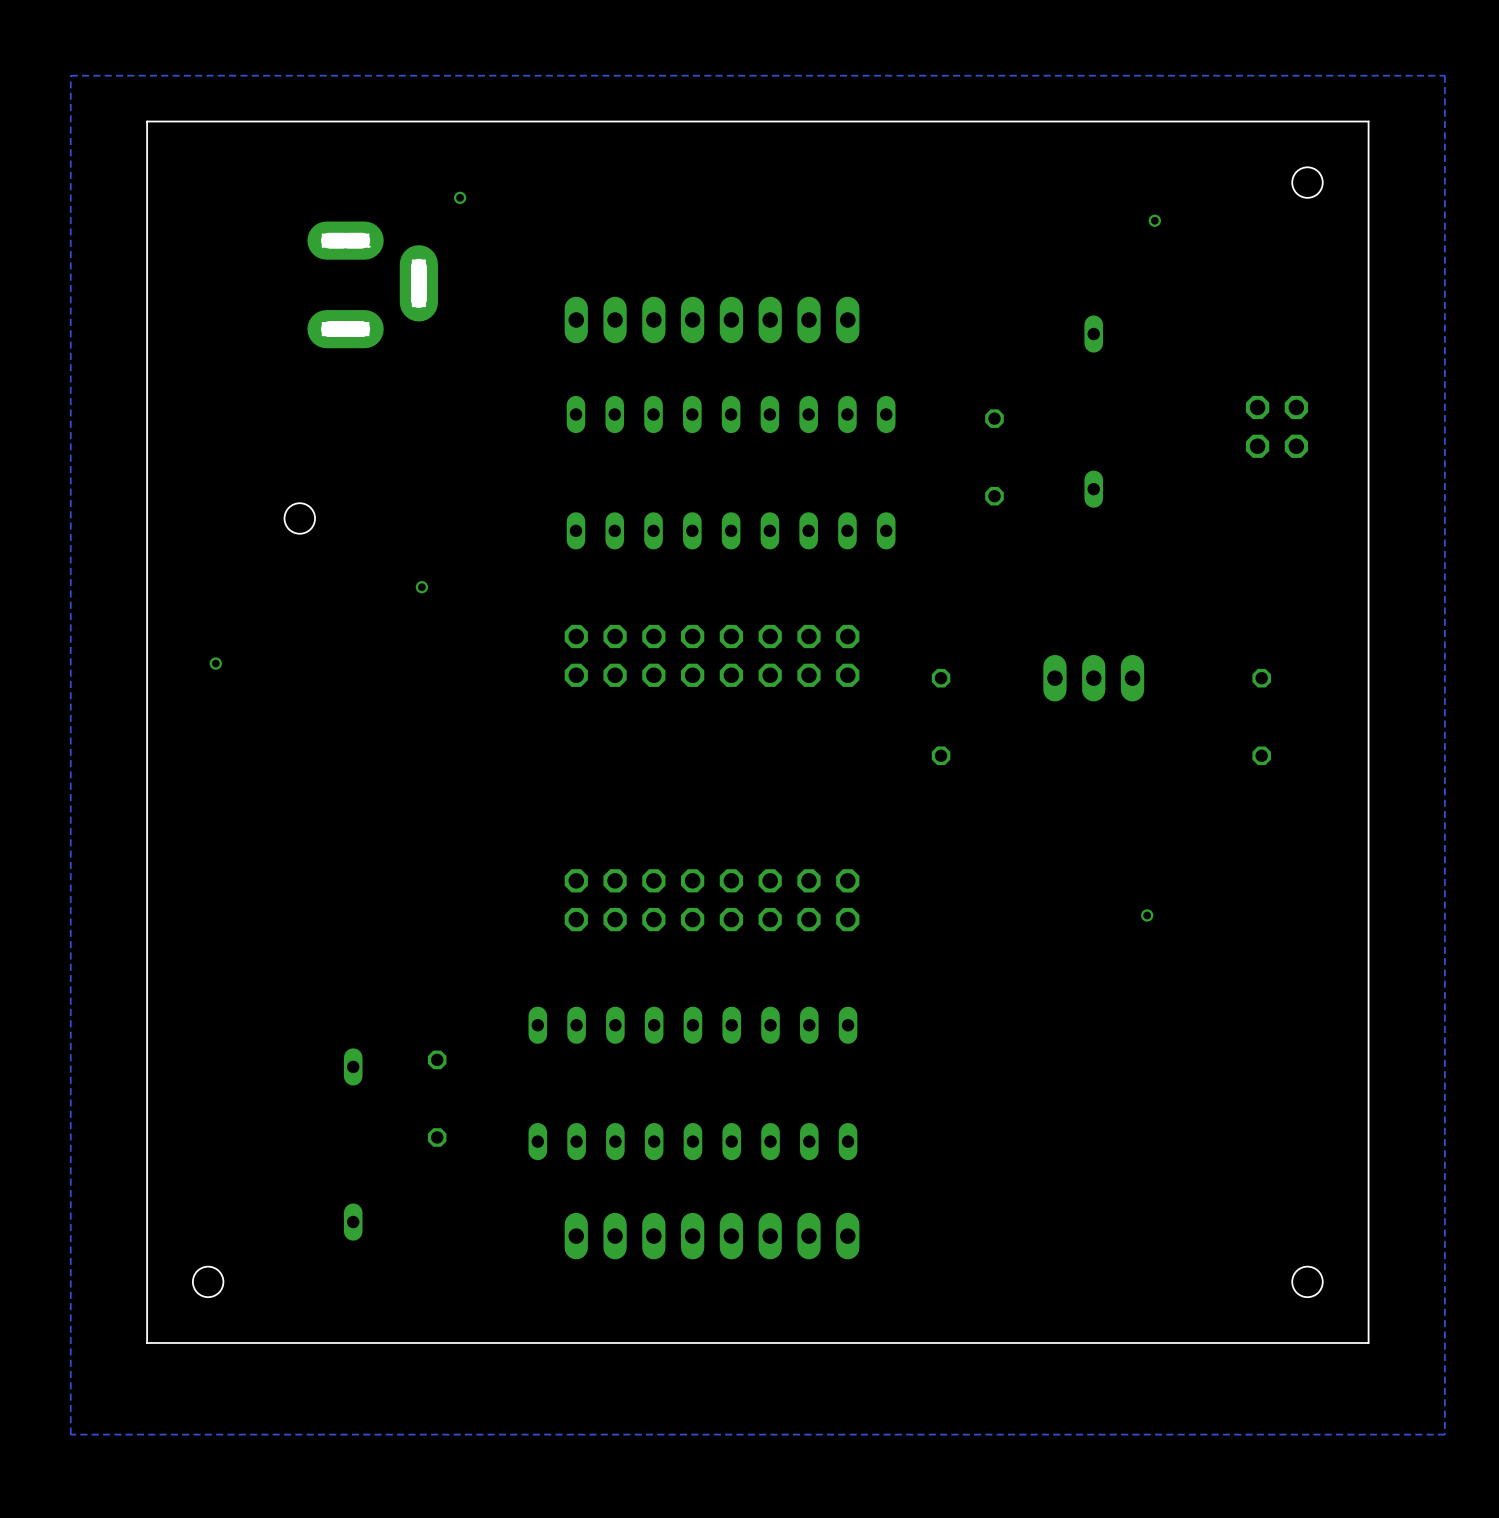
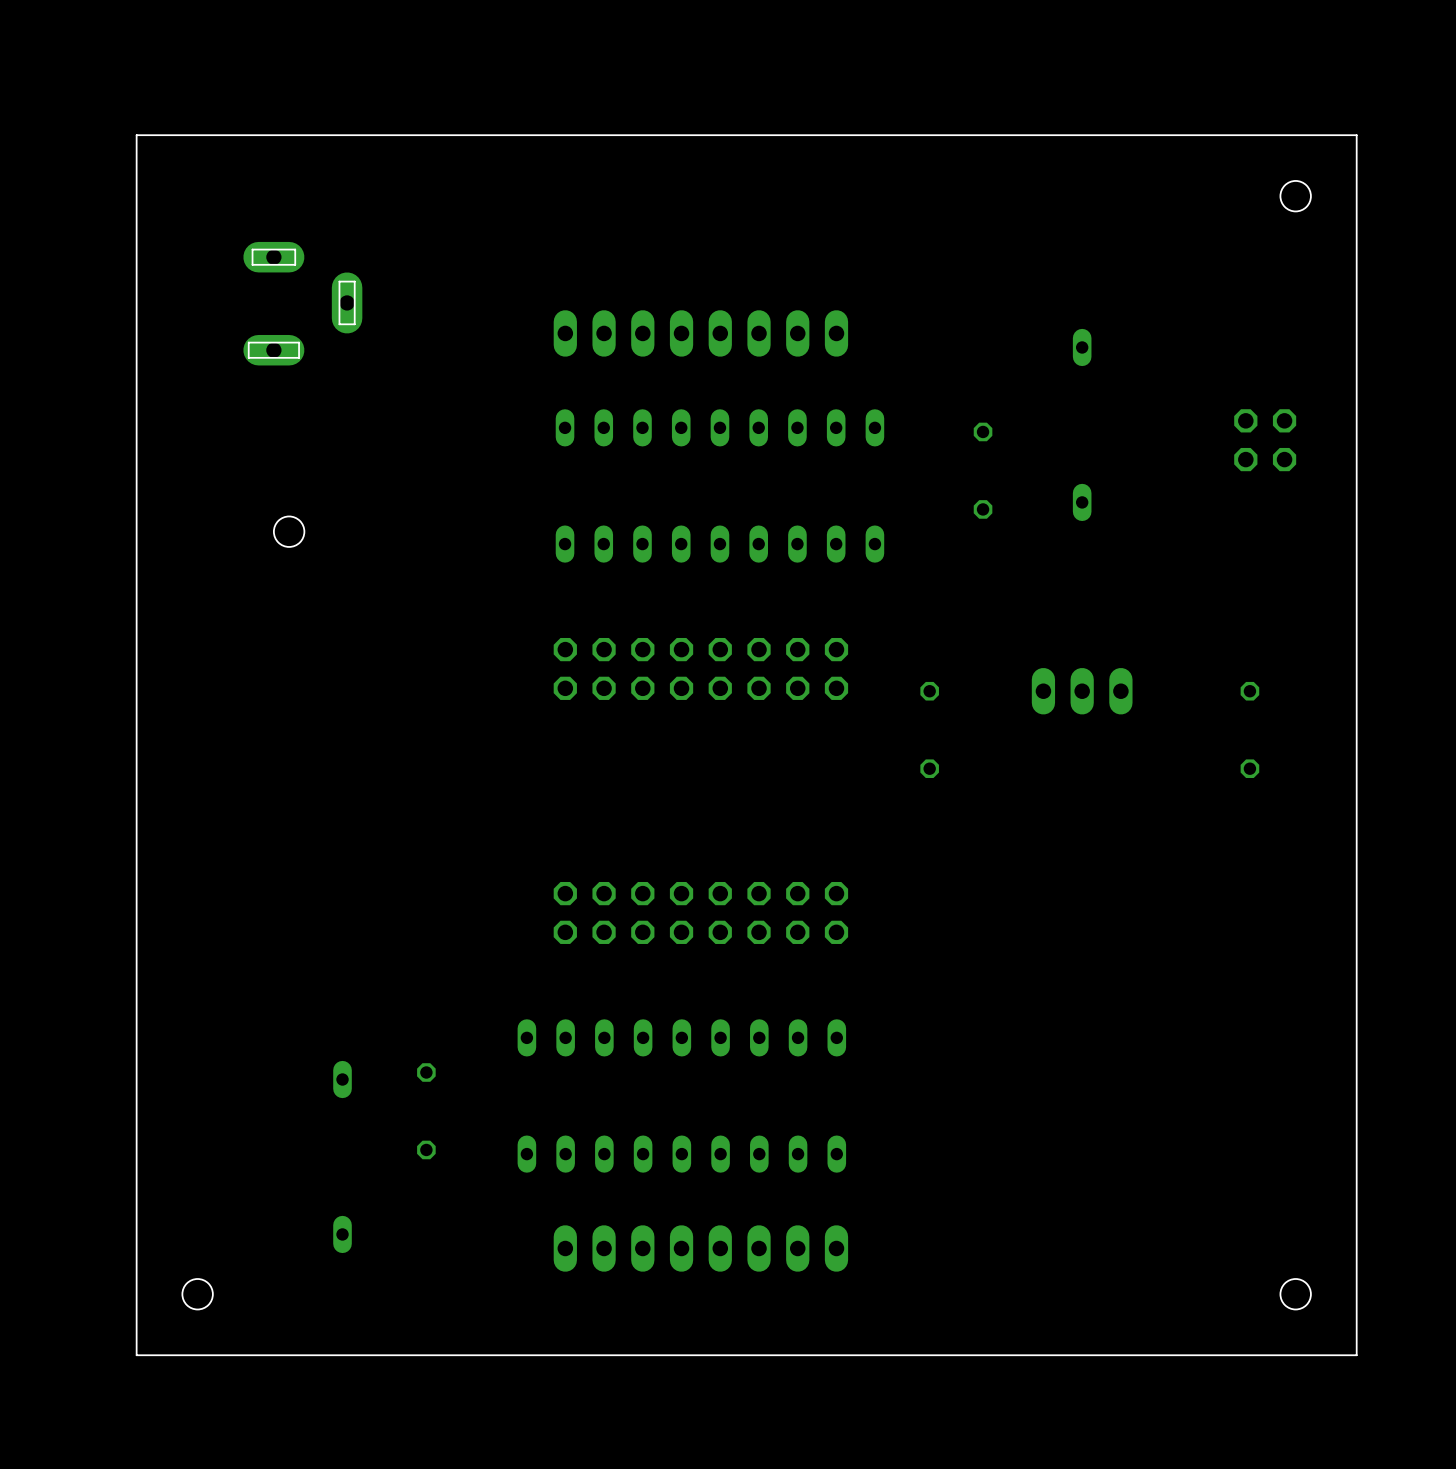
zone outline: (1444, 75) (1444, 1434) (70, 1434) (70, 75) (1444, 75) -> none
via: (460, 197) -> none
via: (1154, 220) -> none
part: (372, 284) -> none
part: none -> (302, 303)
via: (421, 587) -> none
via: (215, 663) -> none
via: (1147, 915) -> none

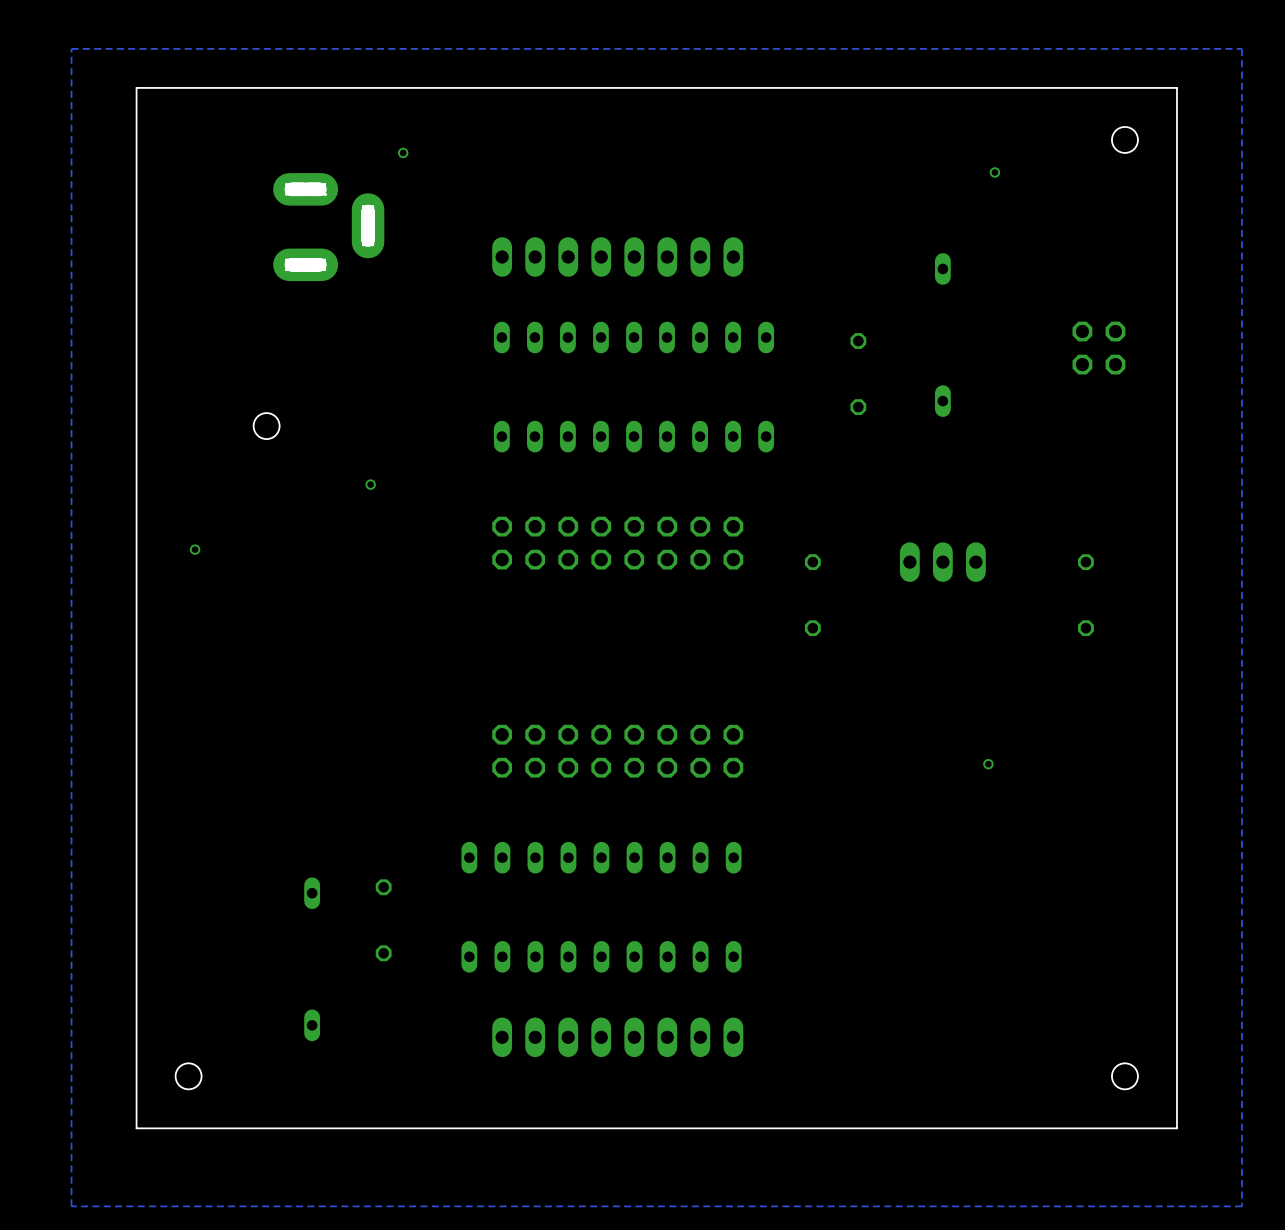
zone outline: none -> (1242, 48) (1242, 1206) (71, 1206) (71, 48) (1242, 48)
via: none -> (403, 152)
via: none -> (994, 172)
part: none -> (328, 227)
part: (302, 303) -> none
via: none -> (370, 484)
via: none -> (195, 549)
via: none -> (988, 764)

